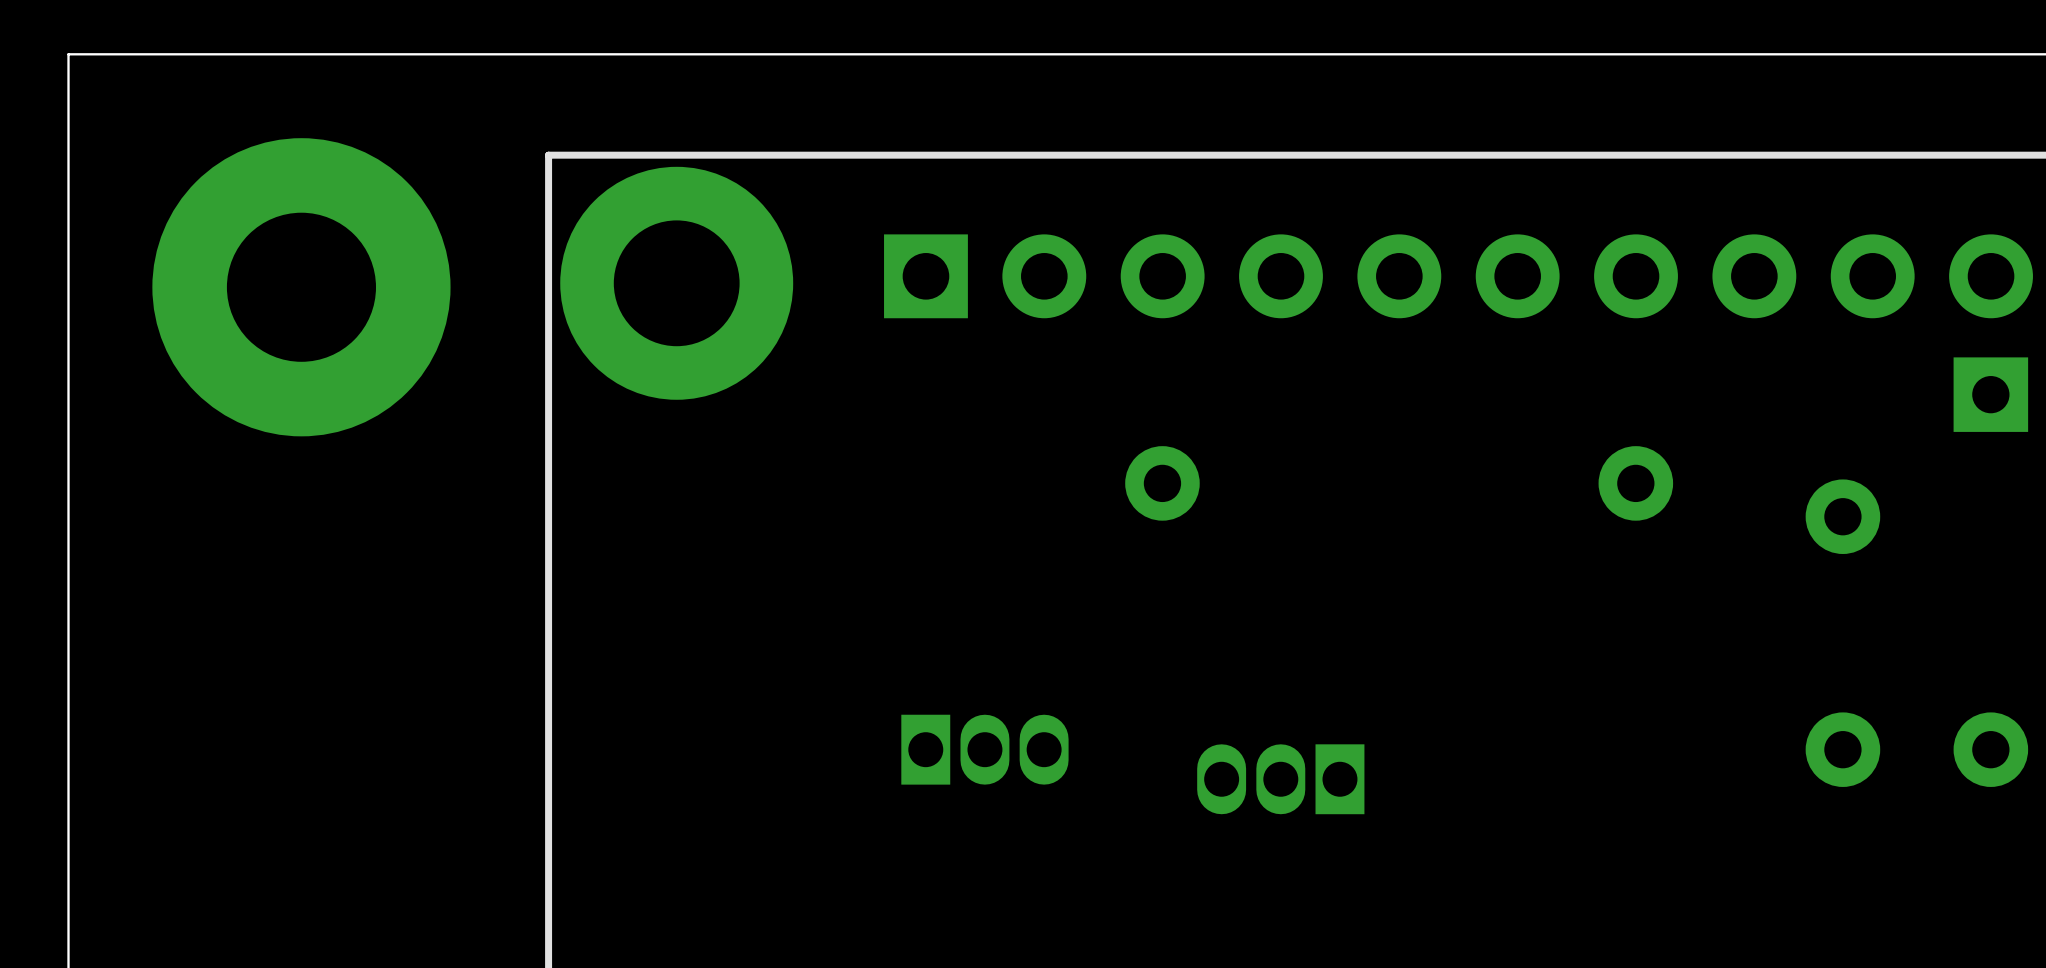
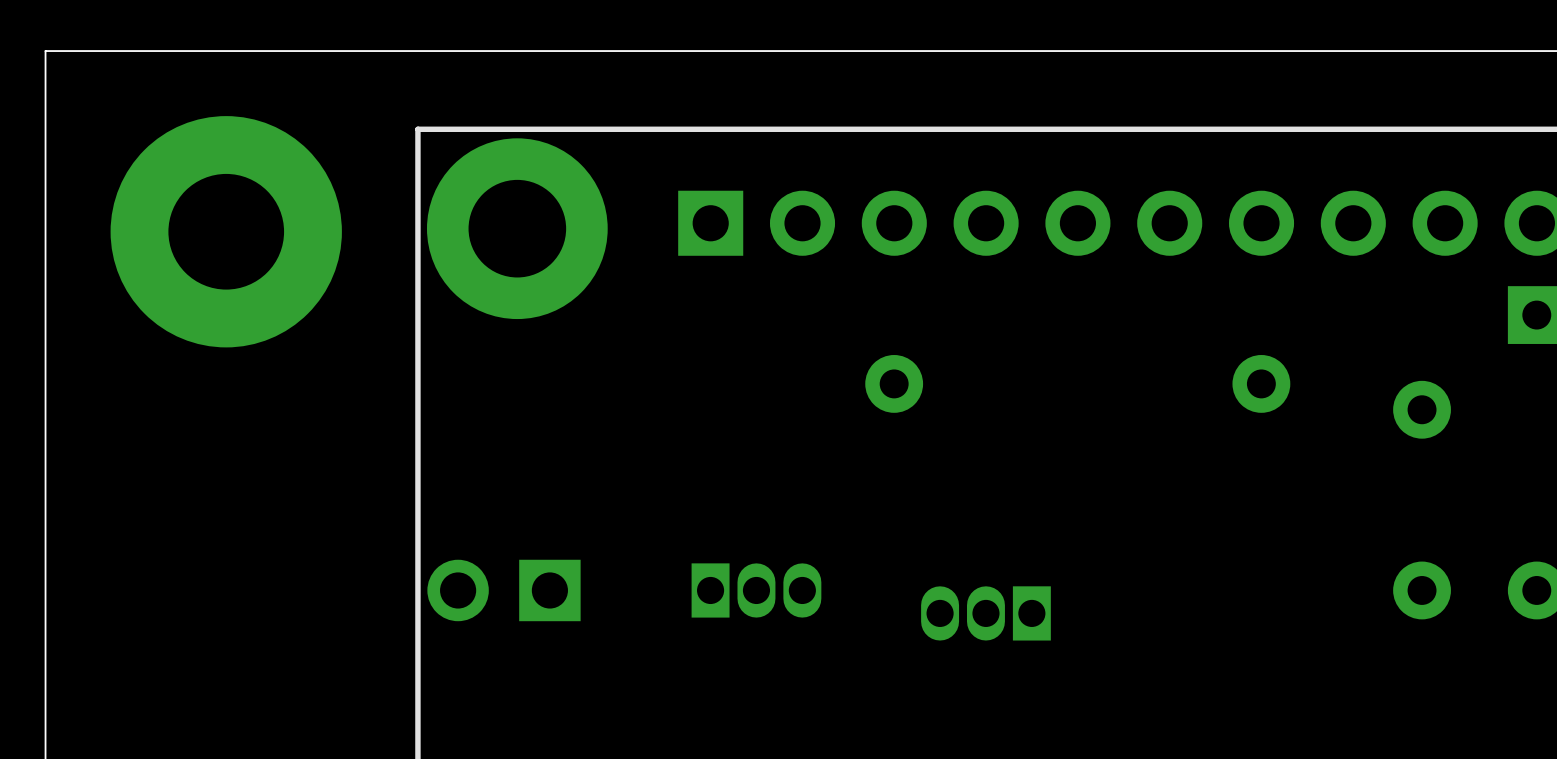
part: none -> (504, 590)

